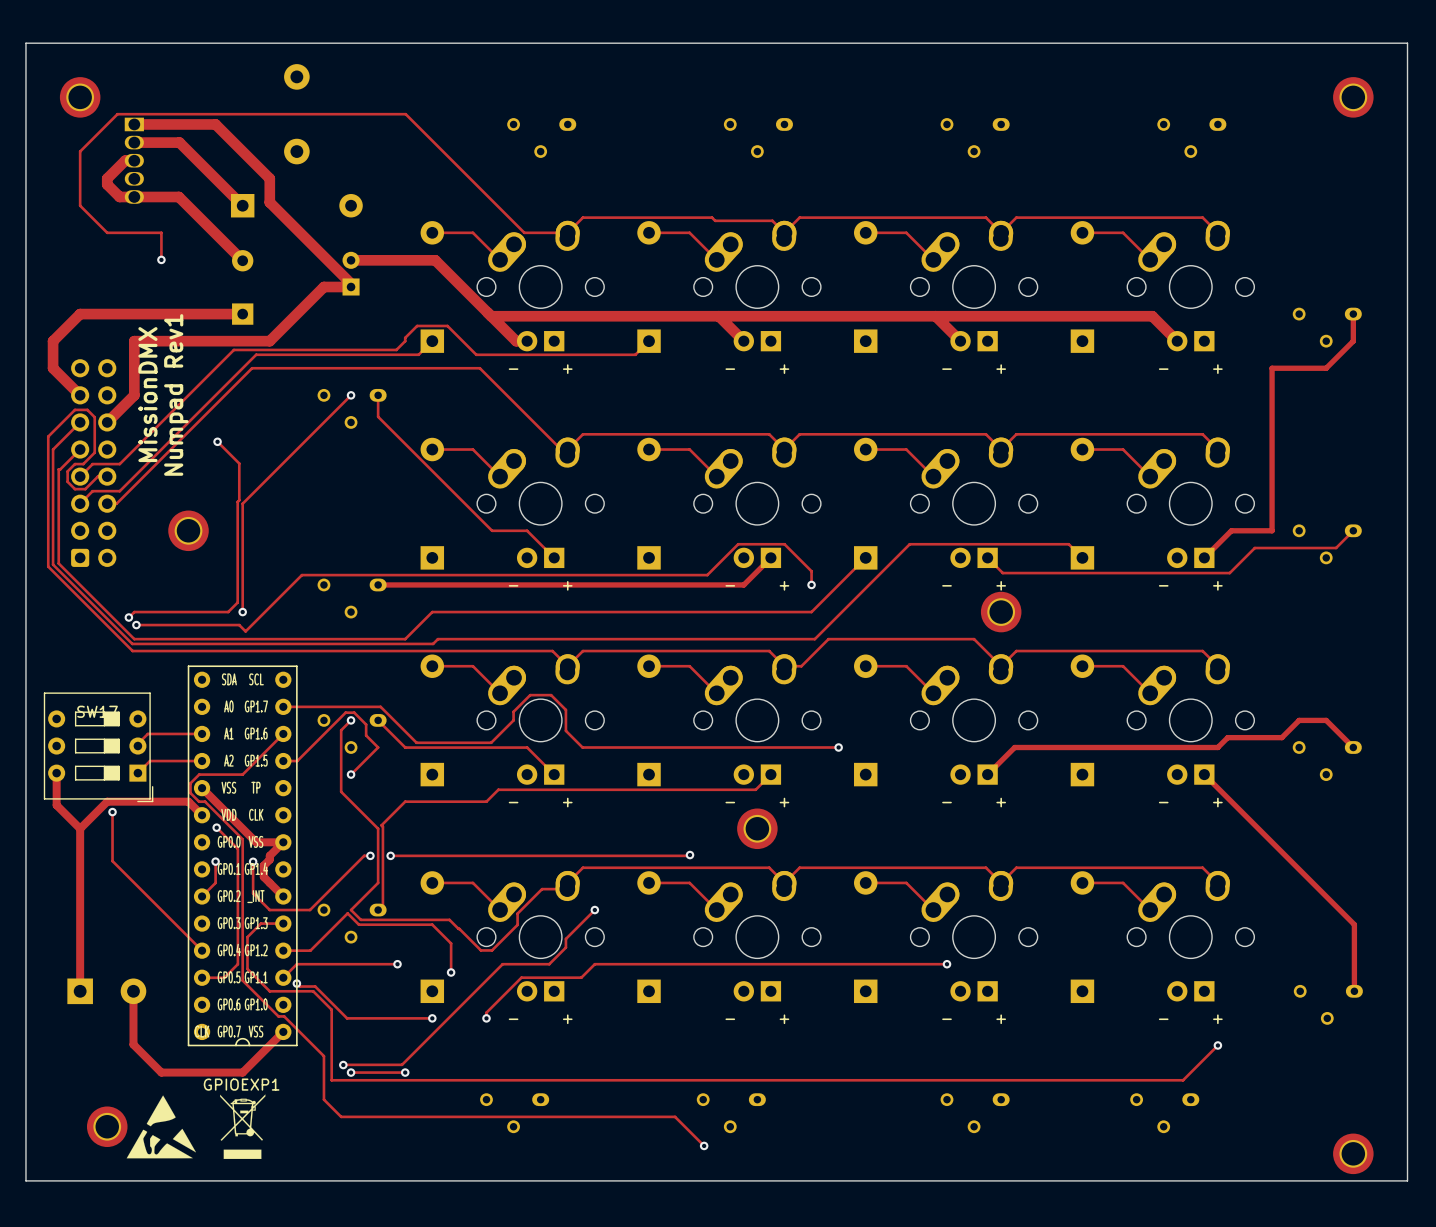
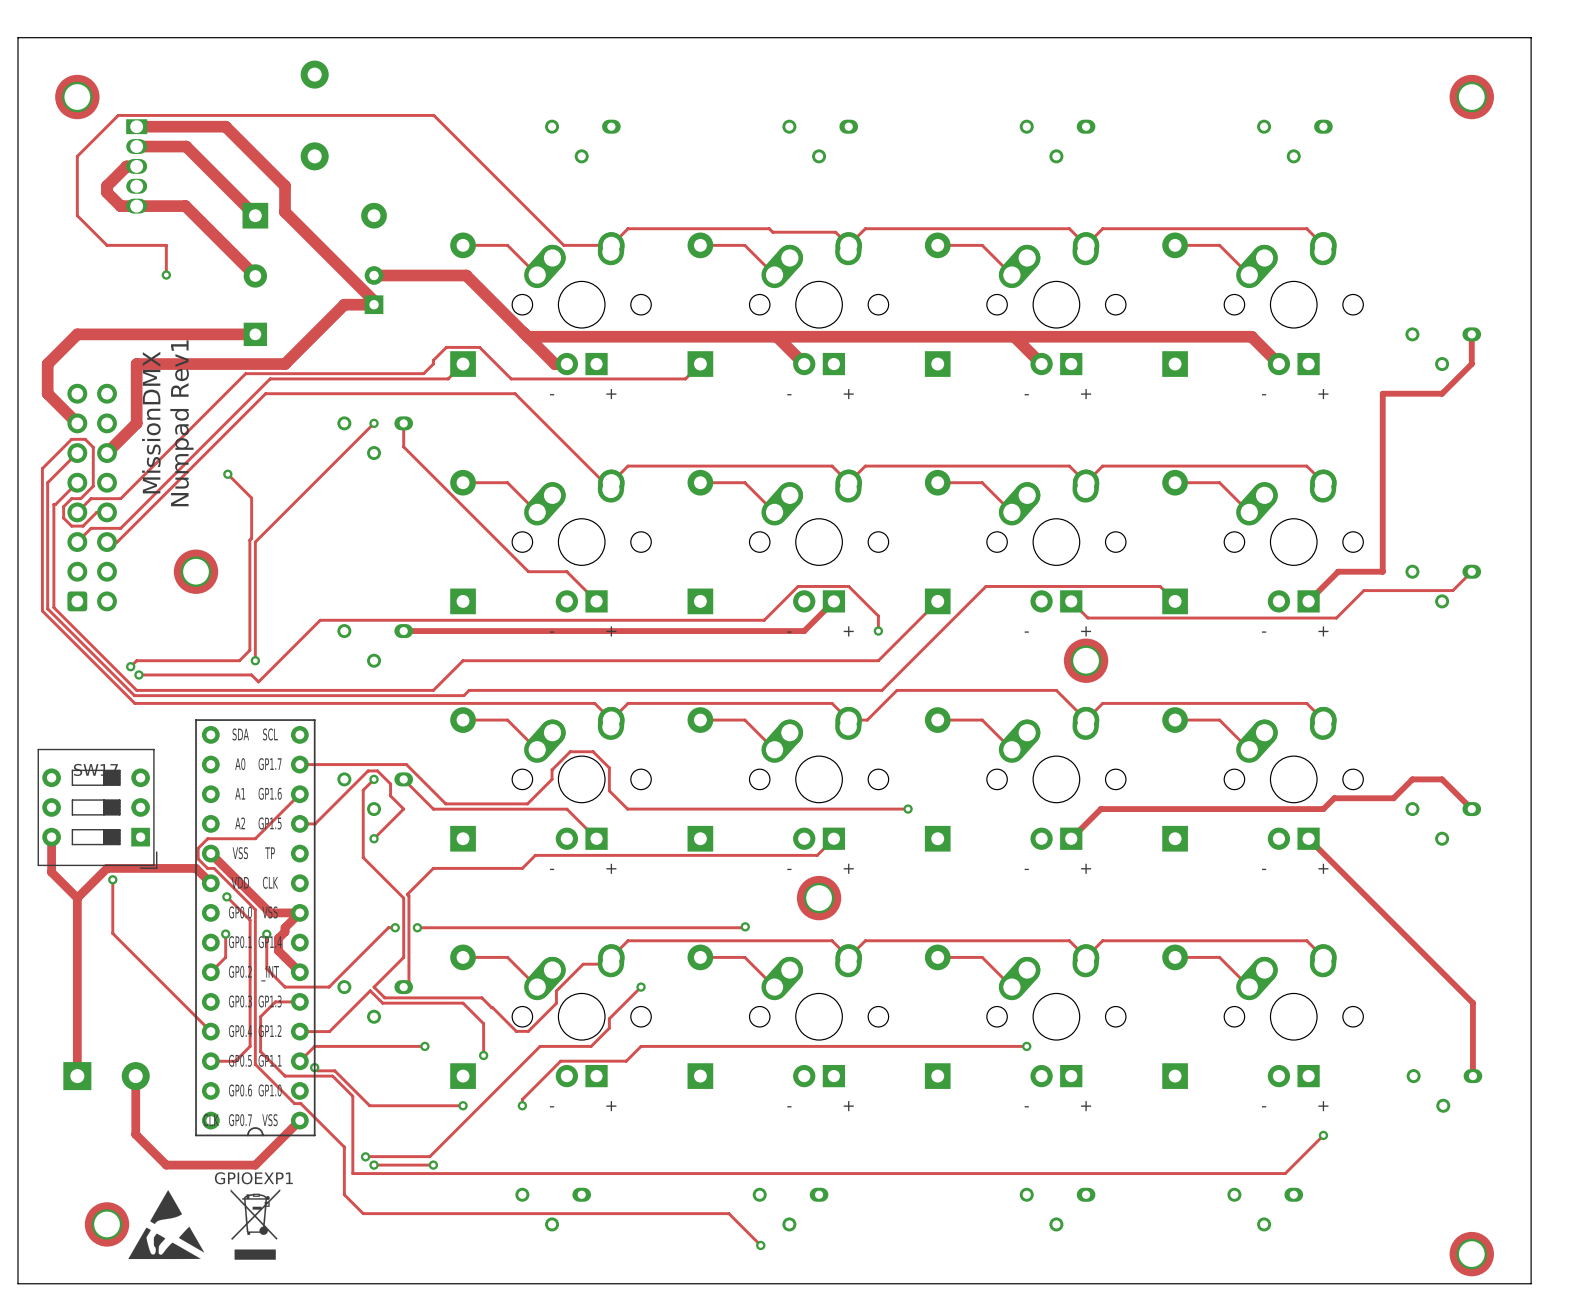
track: (202, 733) (147, 733) (134, 747) -> none
track: (202, 761) (149, 761) (137, 773) -> none

